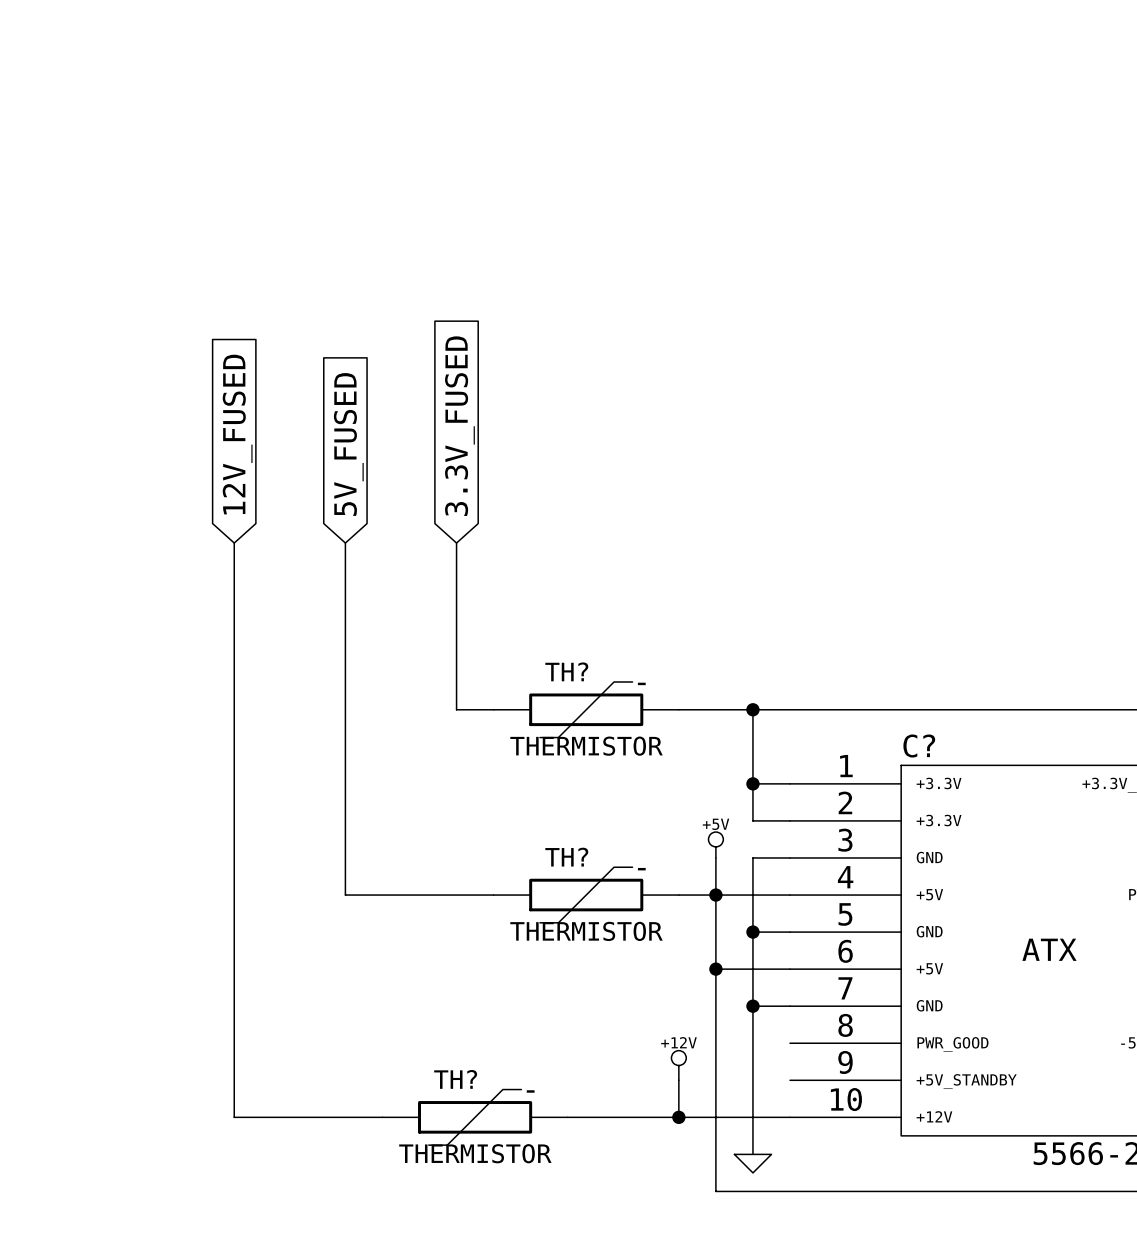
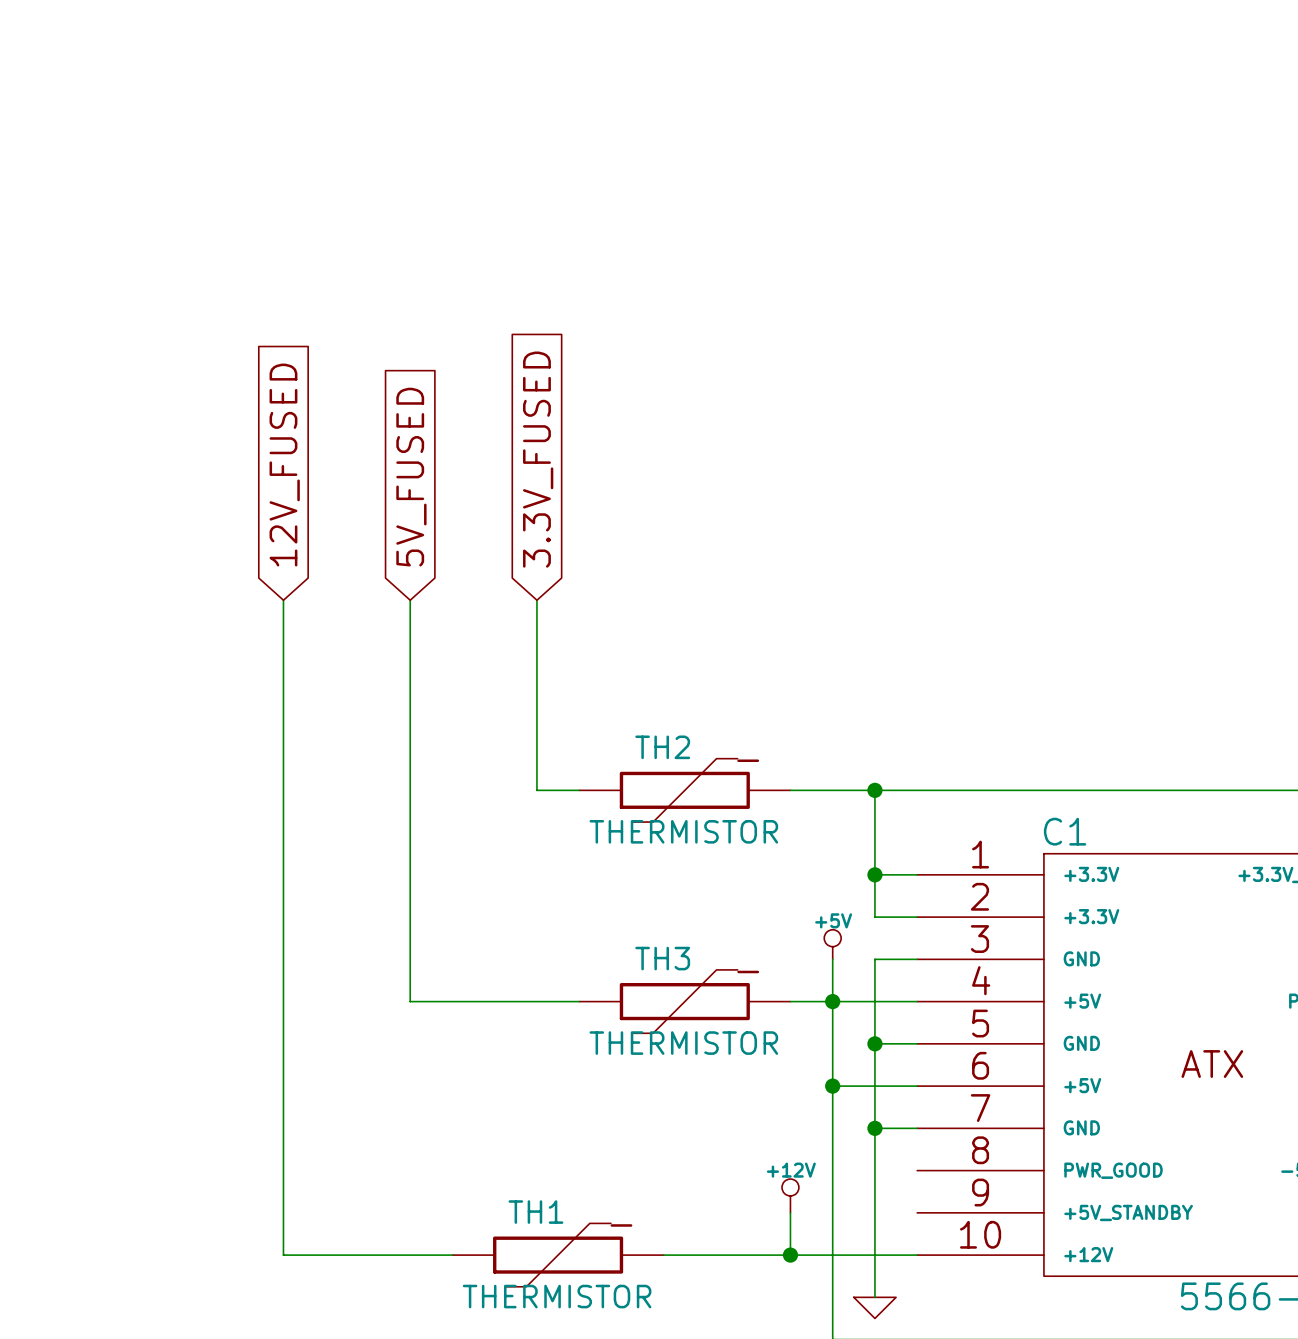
TH? name: TH? (566, 671) -> TH2 (662, 747)
C? name: C? (919, 746) -> C1 (1065, 831)
TH? name: TH? (566, 857) -> TH3 (662, 958)
TH? name: TH? (455, 1079) -> TH1 (535, 1212)

